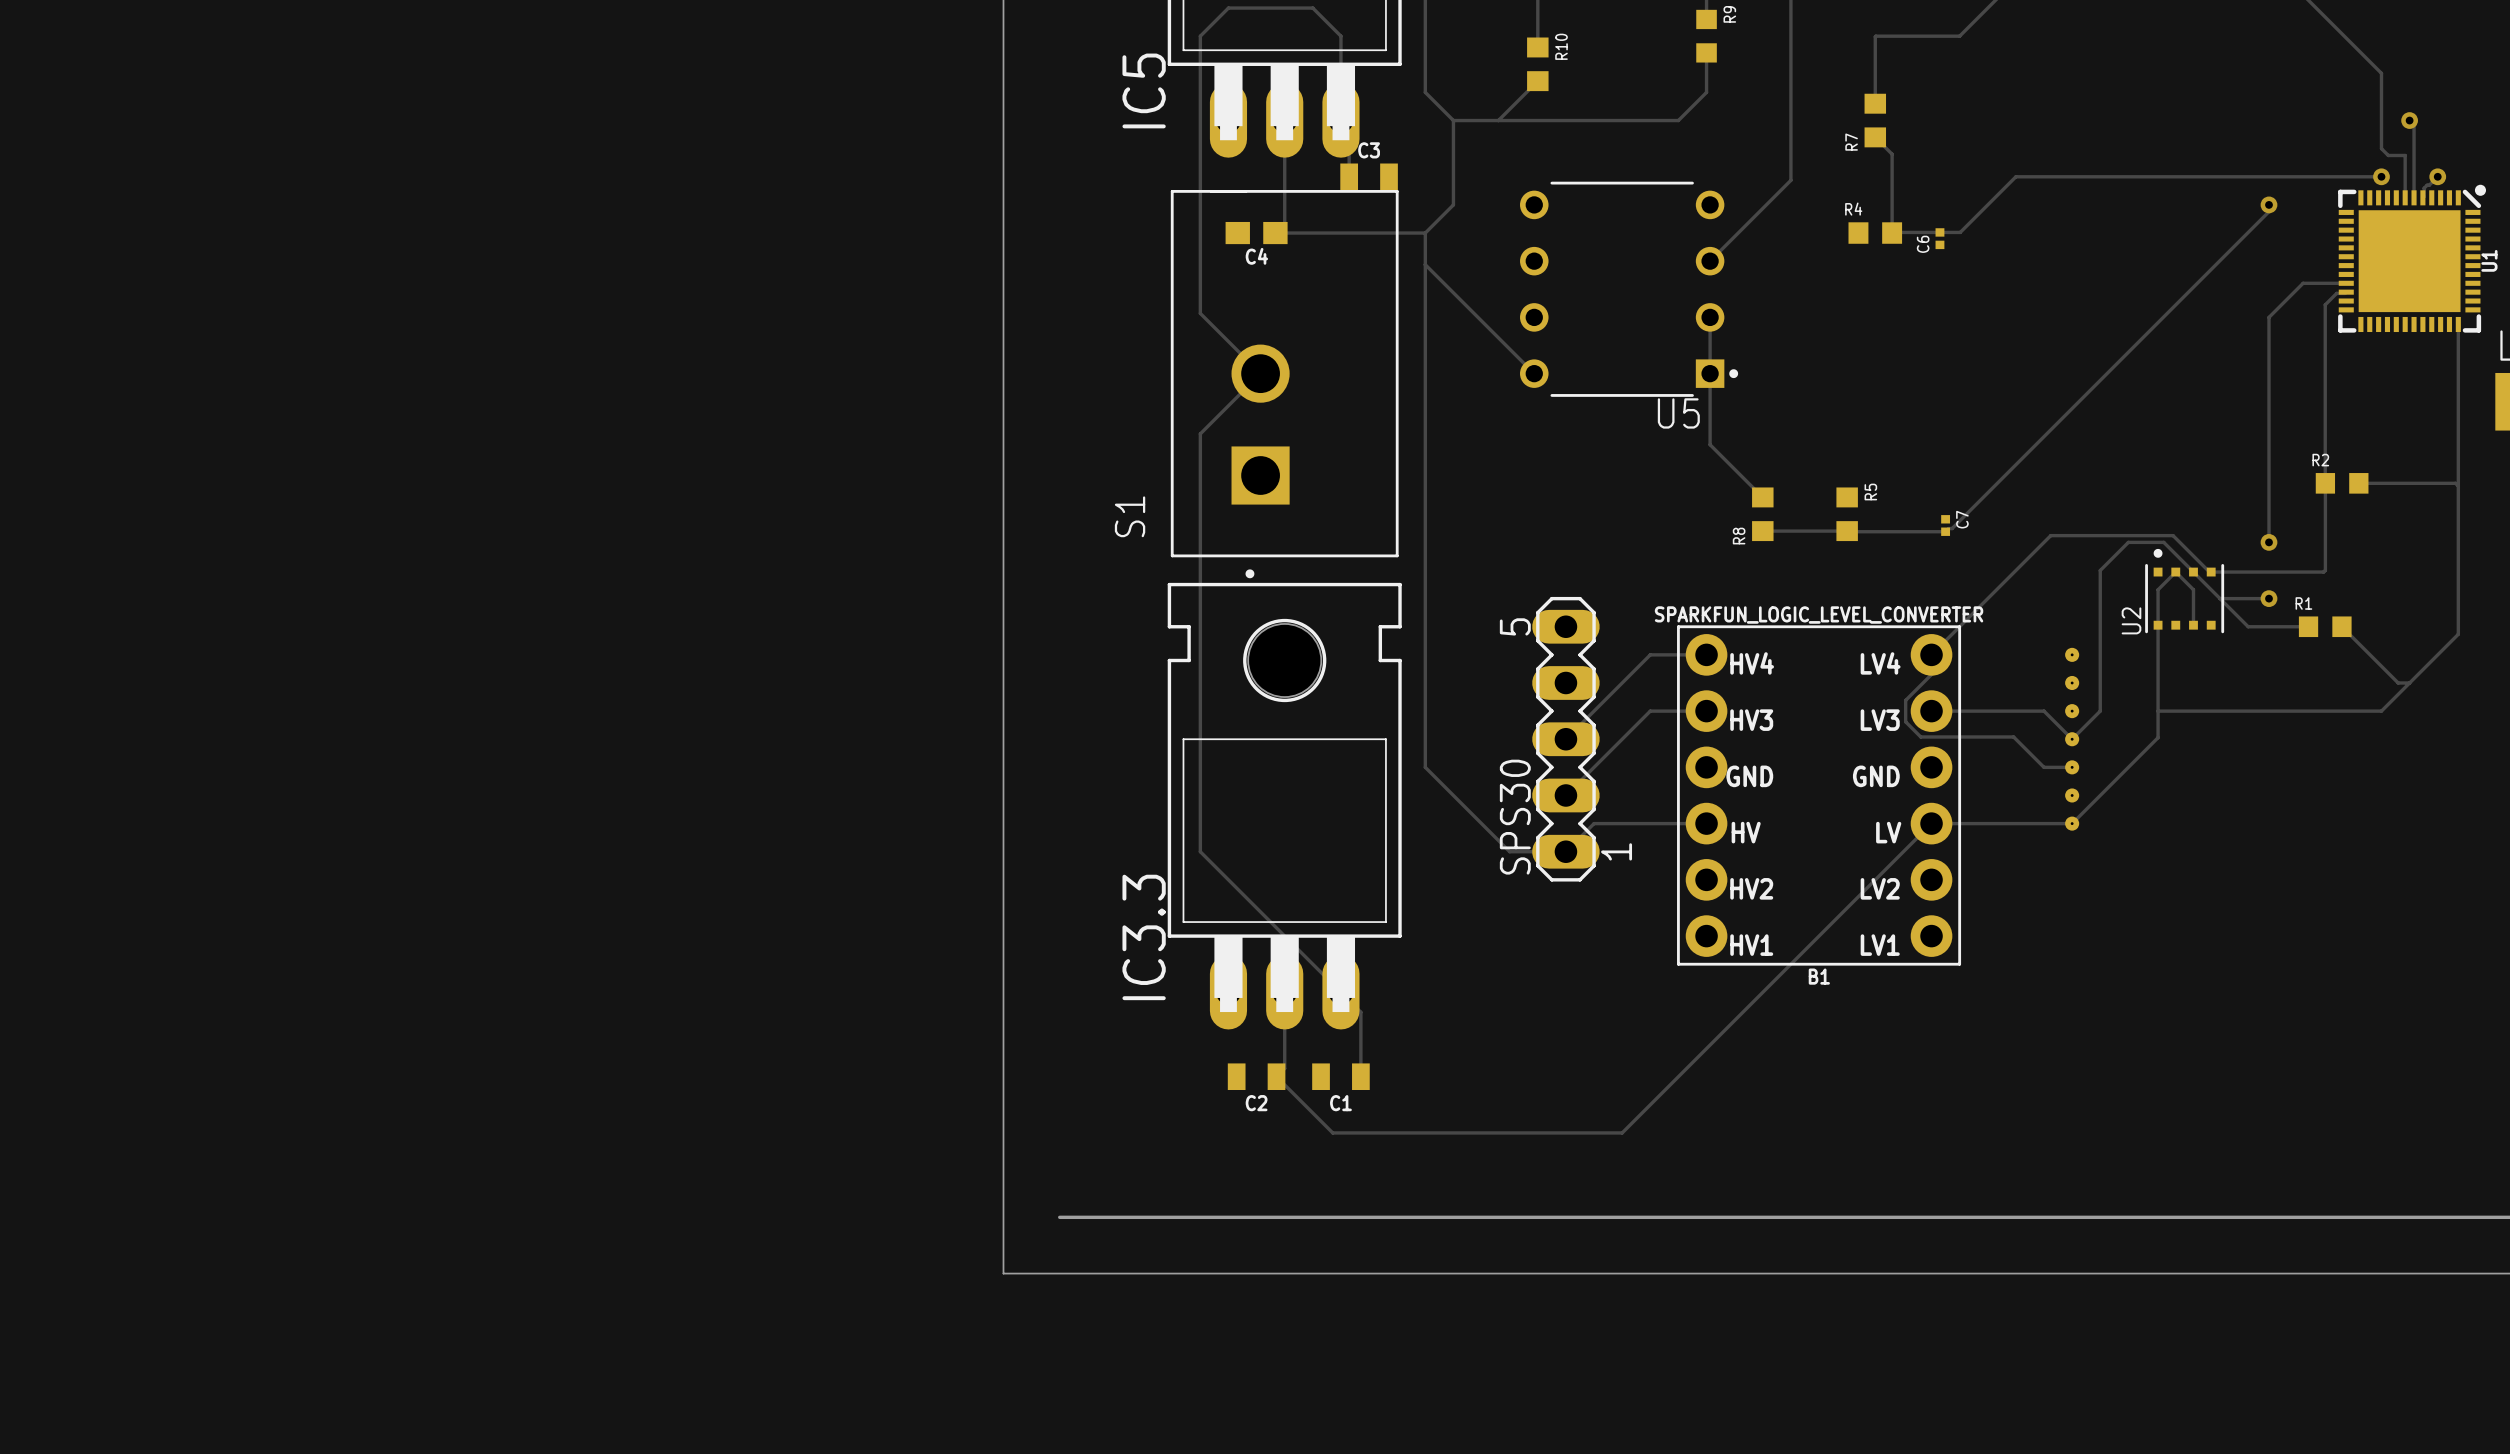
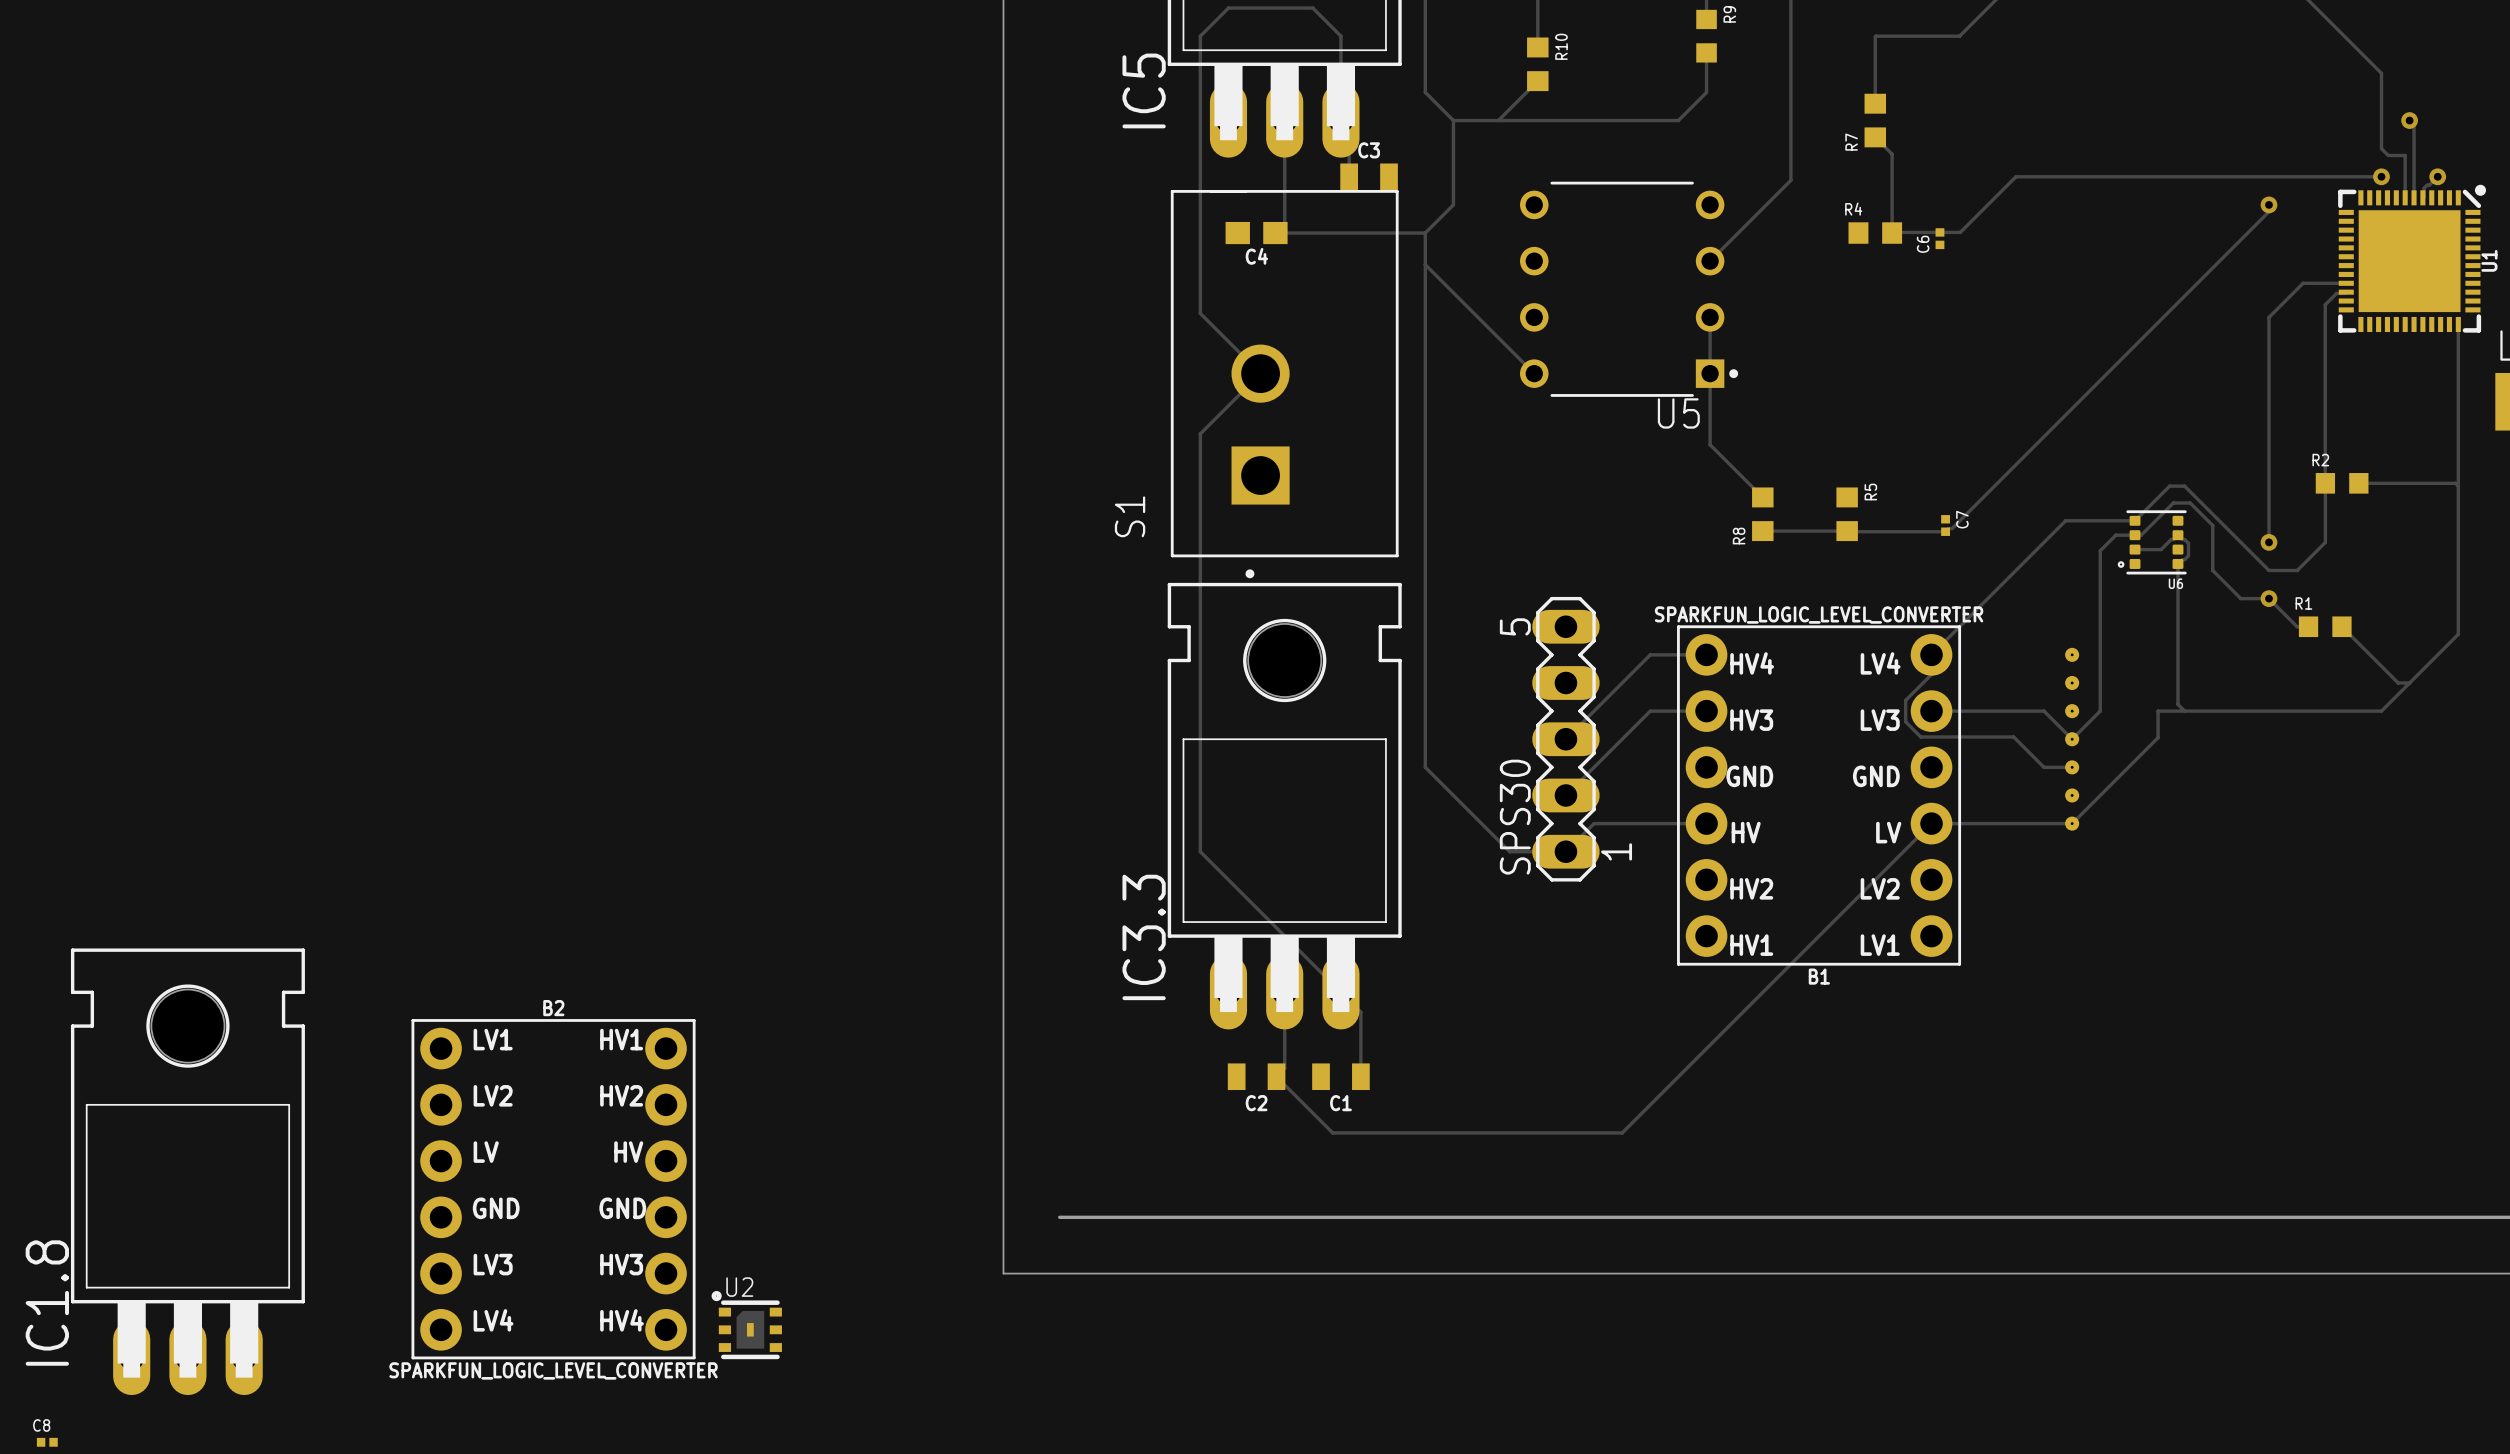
track: (2050, 535) (2173, 535) (2209, 572) (2323, 572) (2325, 570) (2325, 542) -> (2050, 535) (2065, 520) (2135, 520) (2169, 486) (2184, 486) (2269, 570) (2297, 570) (2325, 542)
U6: none -> (2152, 542)
U2 footprint: [2145, 548, 2225, 634] -> [711, 1291, 782, 1360]
track: none -> (2135, 549) (2161, 549) (2177, 535) (2188, 543) (2188, 555) (2177, 563) (2177, 704) (2184, 711)
track: (2100, 570) (2128, 542) (2163, 542) (2248, 626) (2297, 626) -> (2100, 570) (2100, 550) (2115, 535) (2141, 535) (2173, 503) (2190, 503) (2212, 525) (2212, 570) (2240, 598)
track: (2220, 598) (2240, 598) -> none
track: none -> (2269, 598) (2297, 626)
U2 name position: U2 (2131, 620) -> U2 (739, 1287)
track: (2193, 625) (2193, 589) (2175, 572) (2158, 589) (2158, 711) -> none
IC1.8: none -> (187, 1171)
B2: none -> SPARKFUN_LOGIC_LEVEL_CONVERTER (553, 1189)
C8: none -> (47, 1442)

